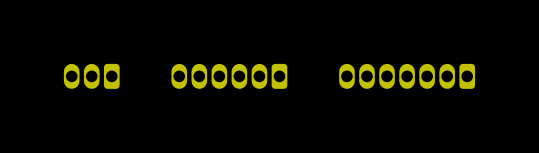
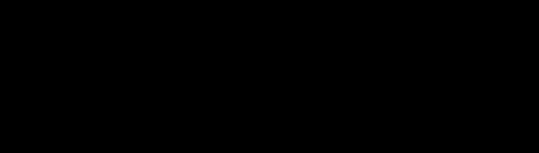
part: (91, 76) -> none
part: (229, 76) -> none
part: (407, 76) -> none

